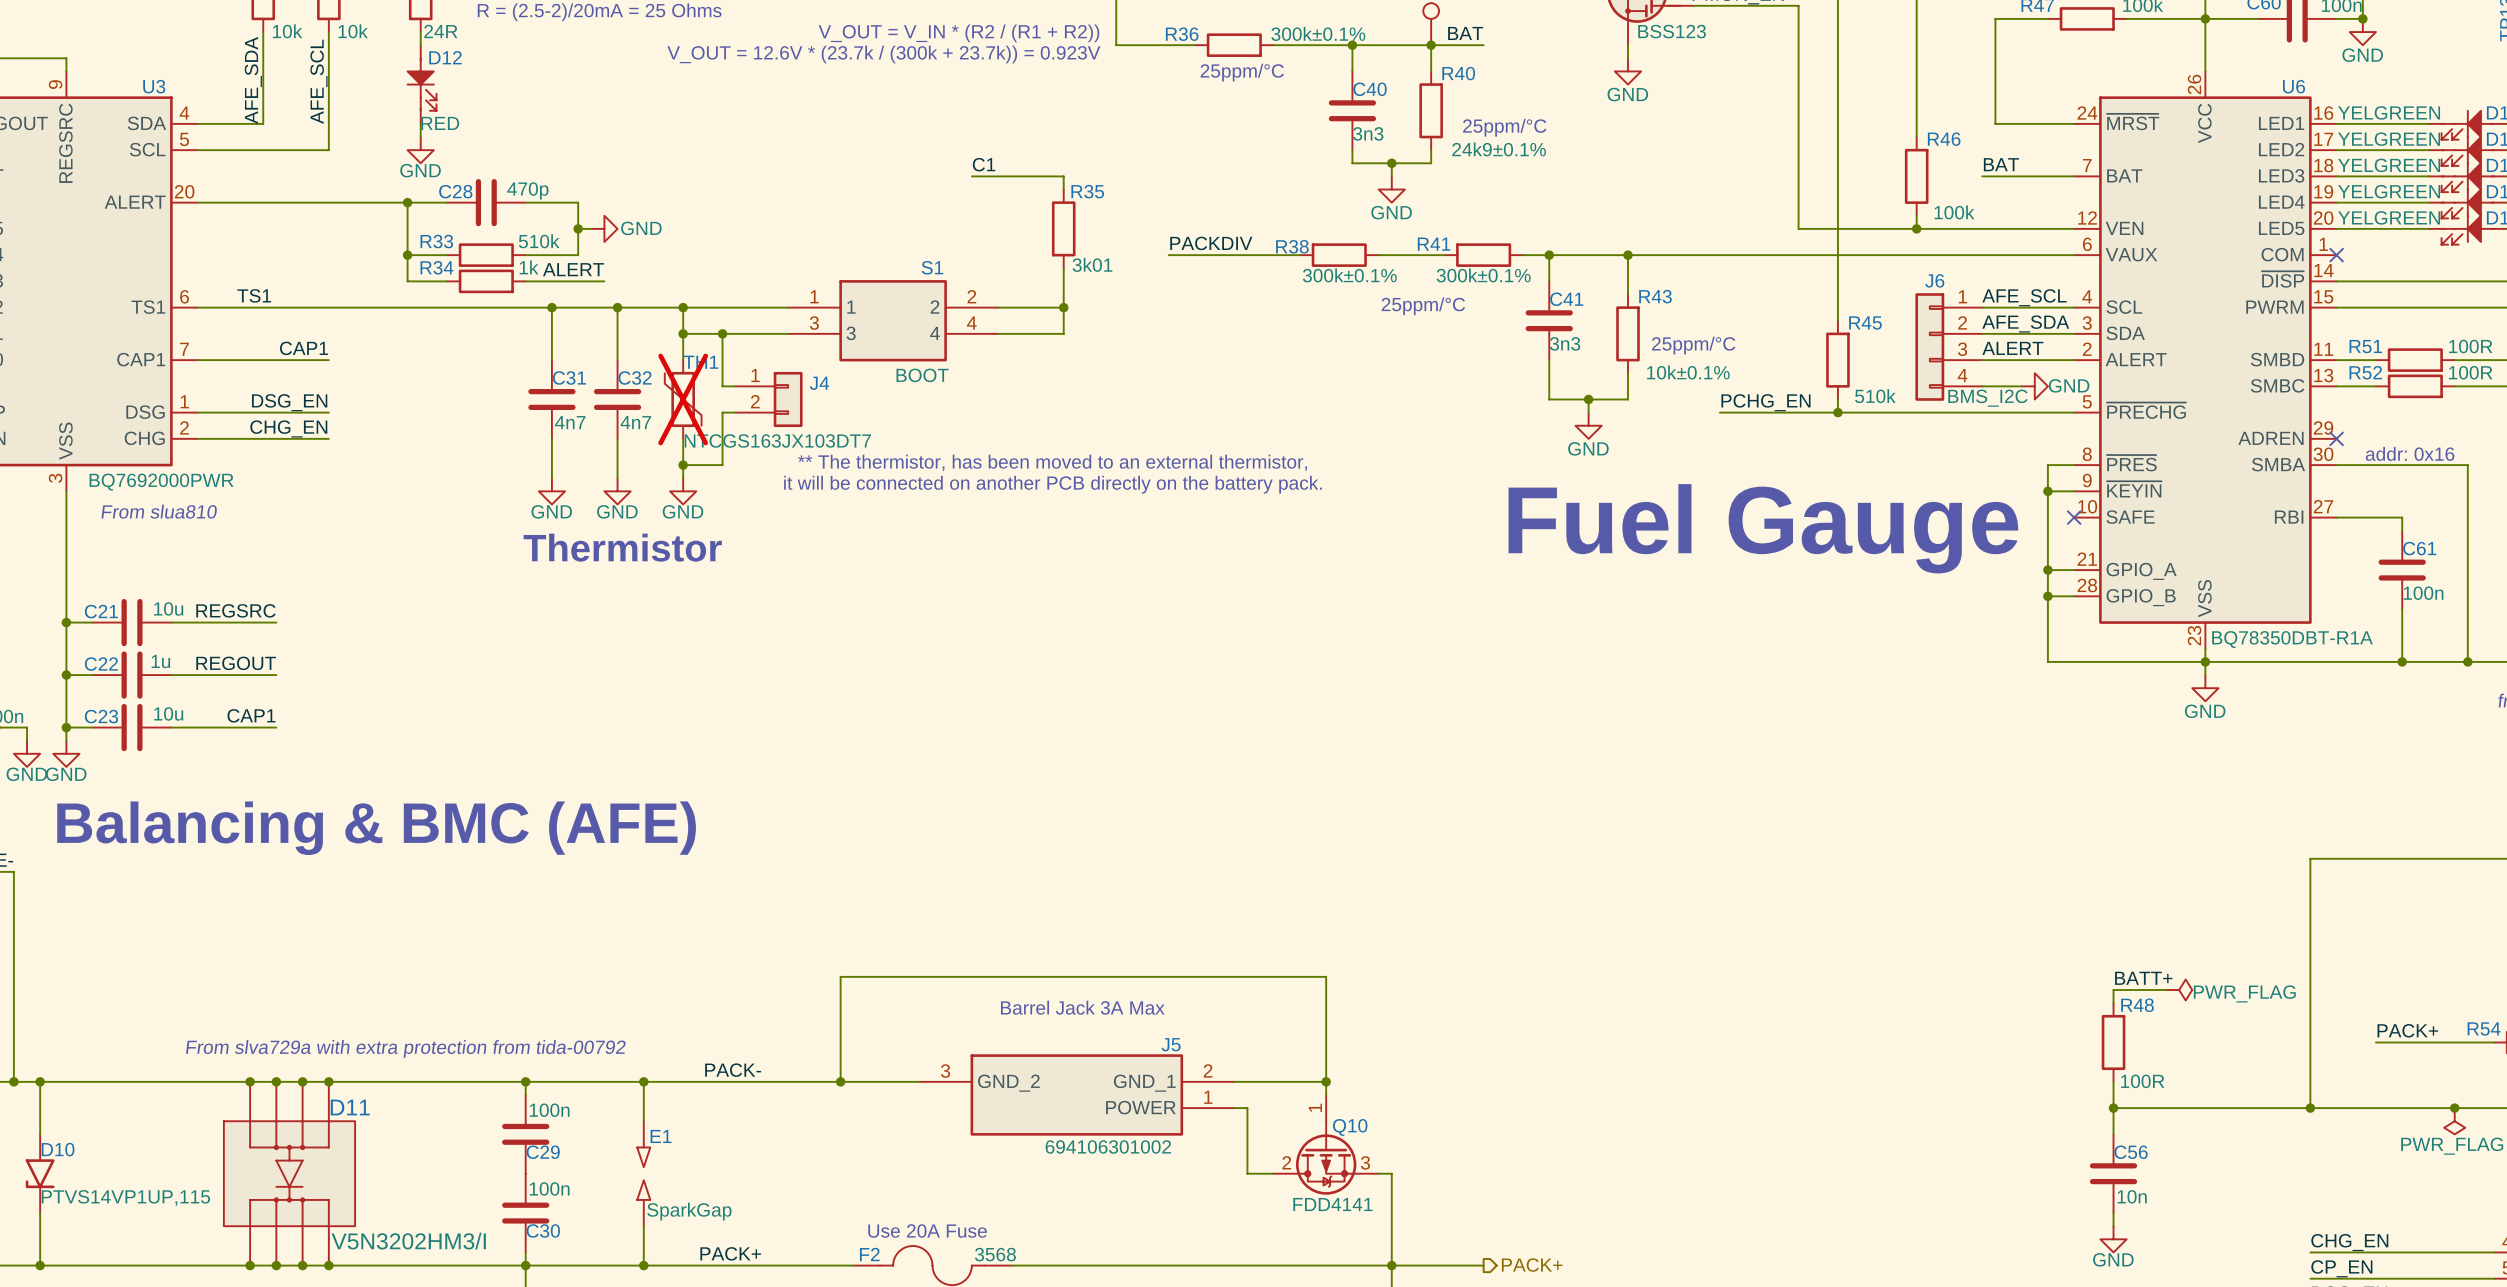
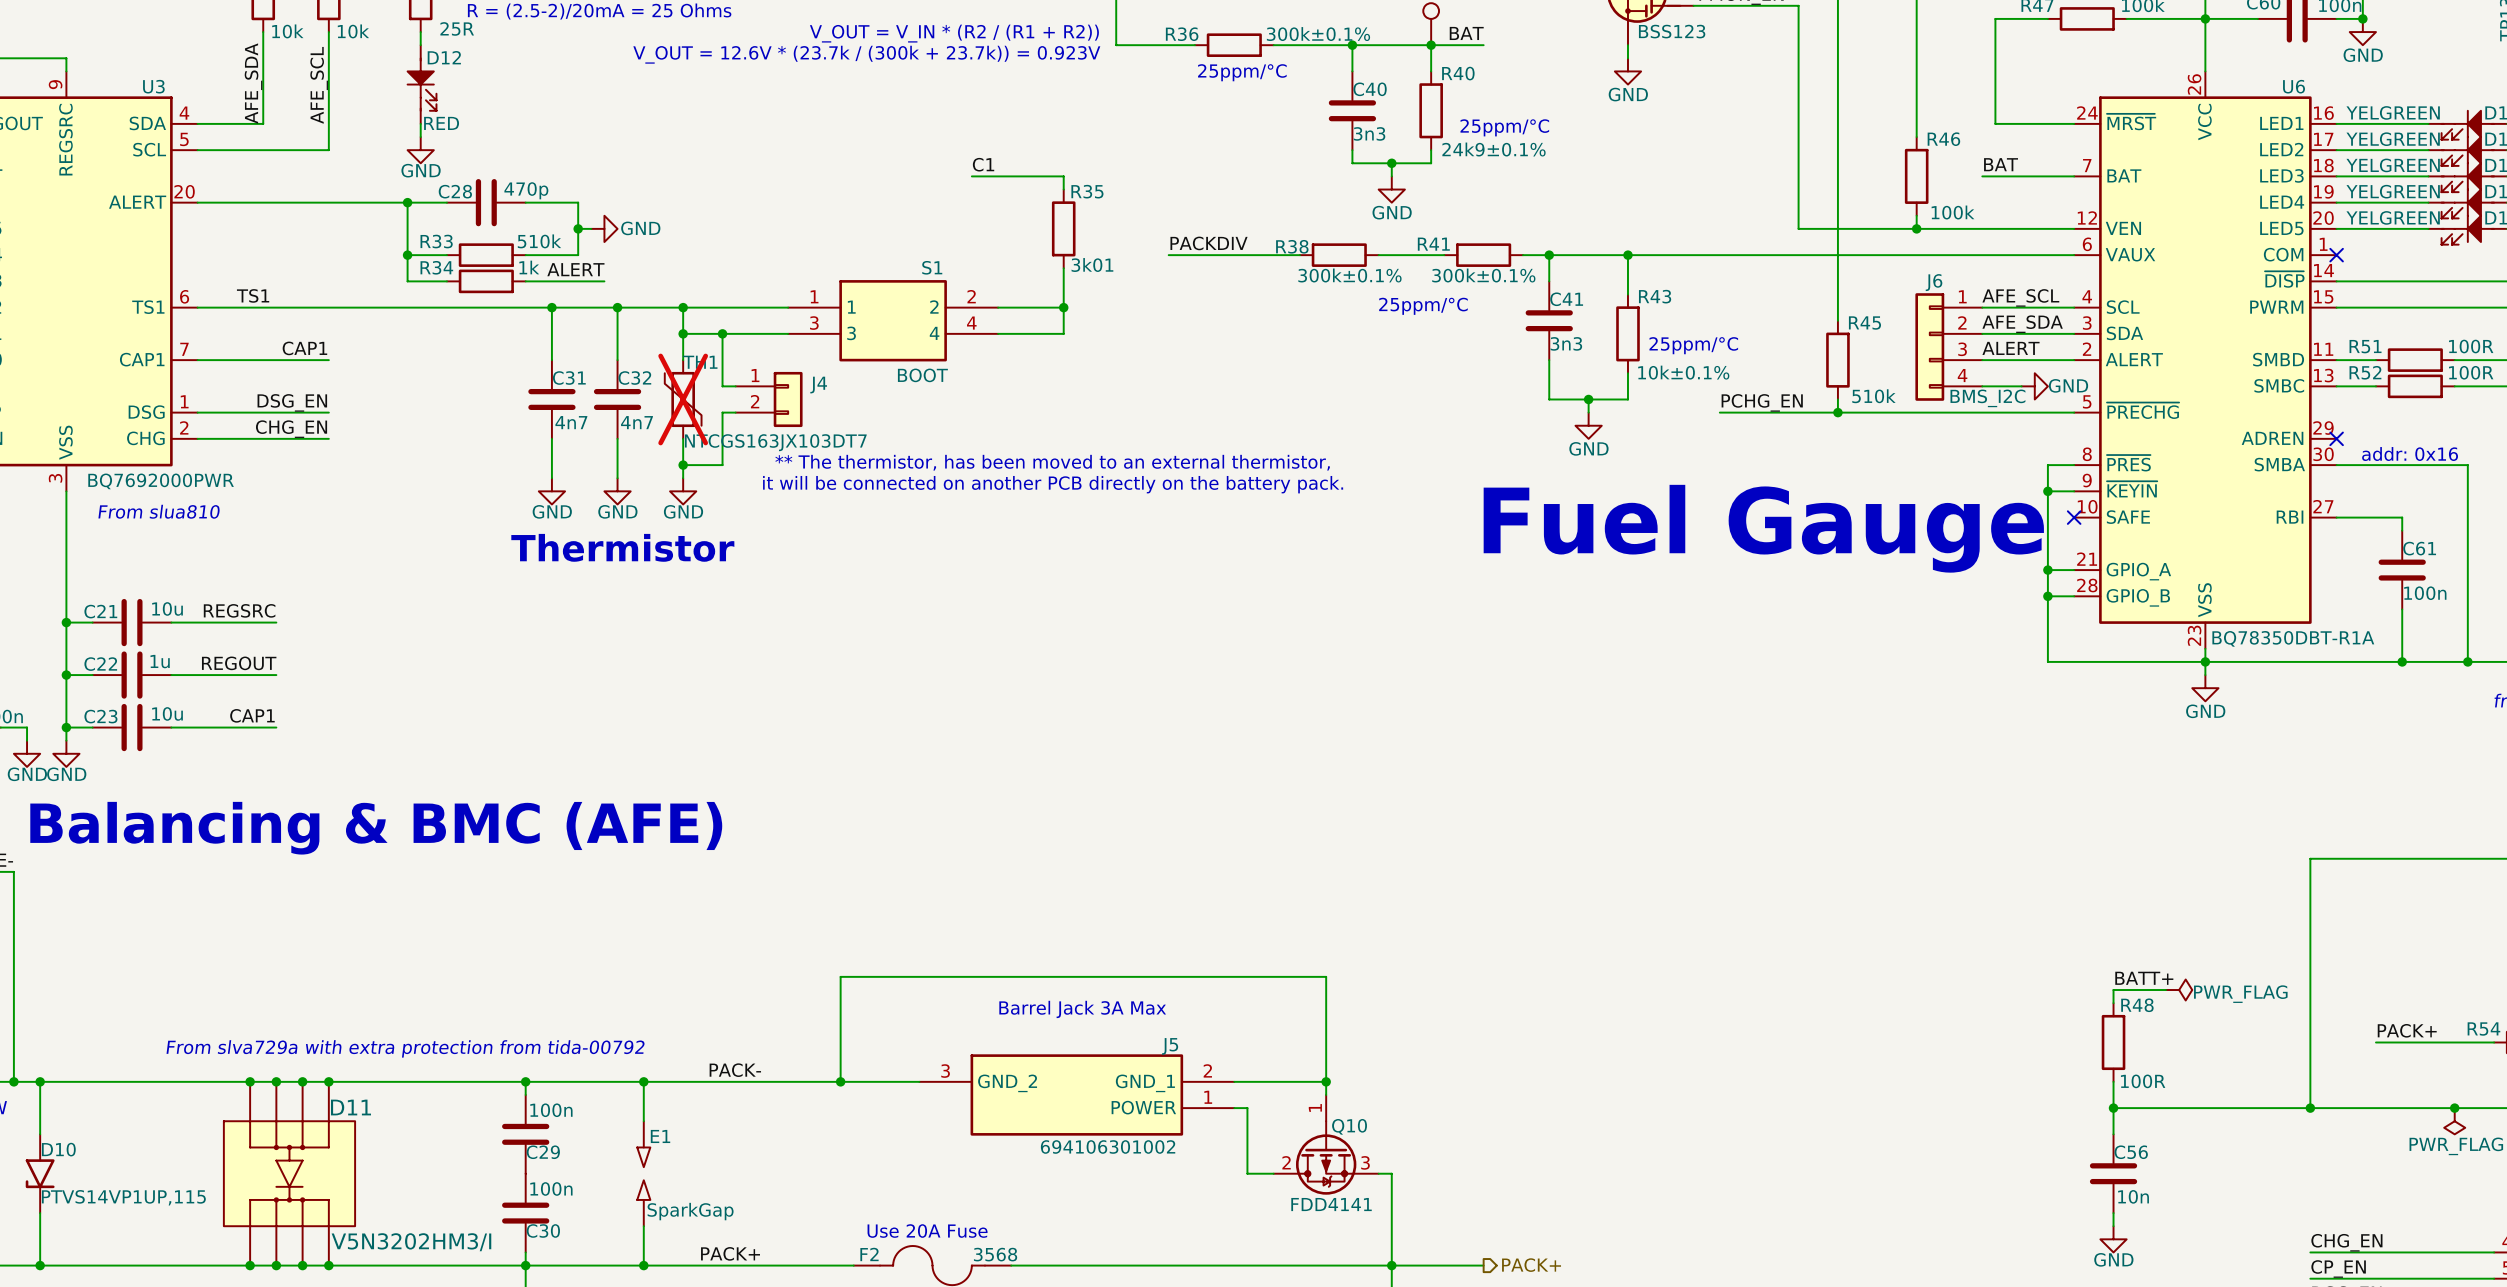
part value: 24R (440, 31) -> 25R (457, 28)

